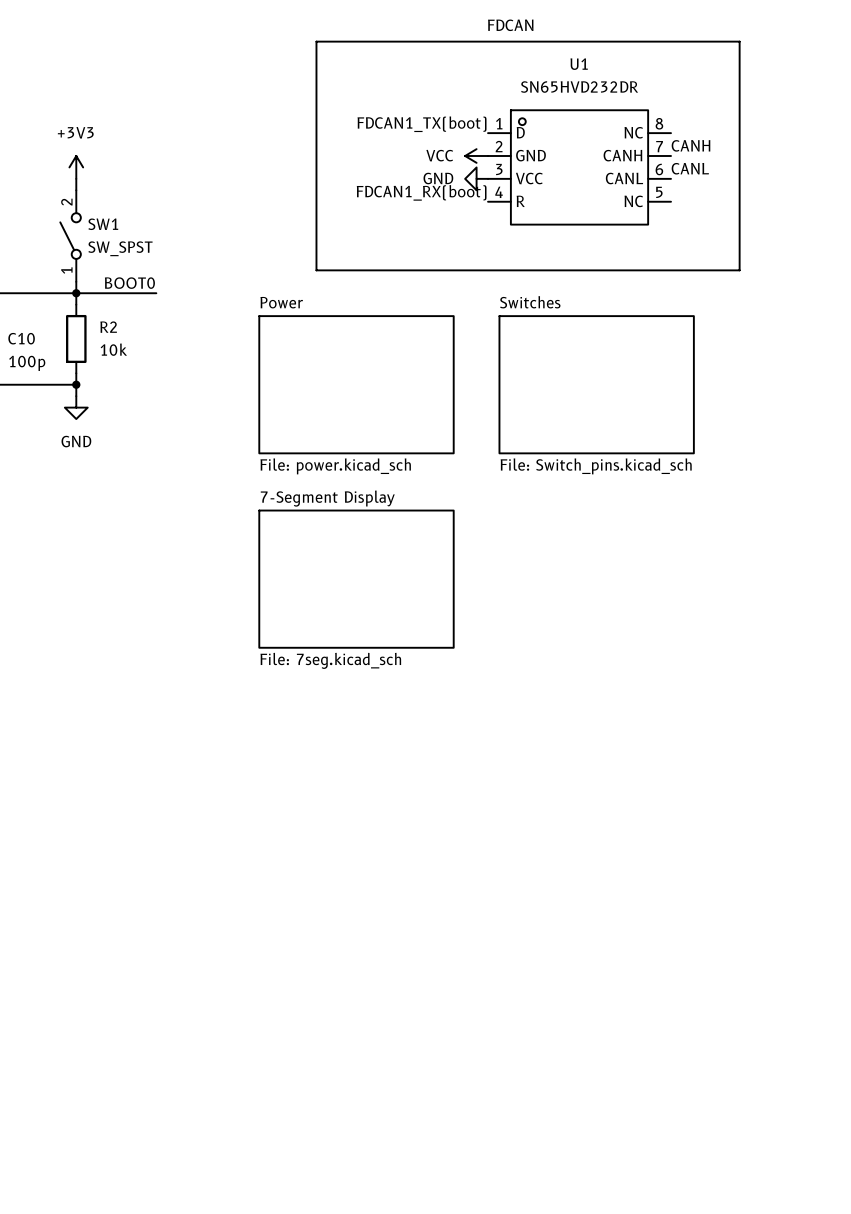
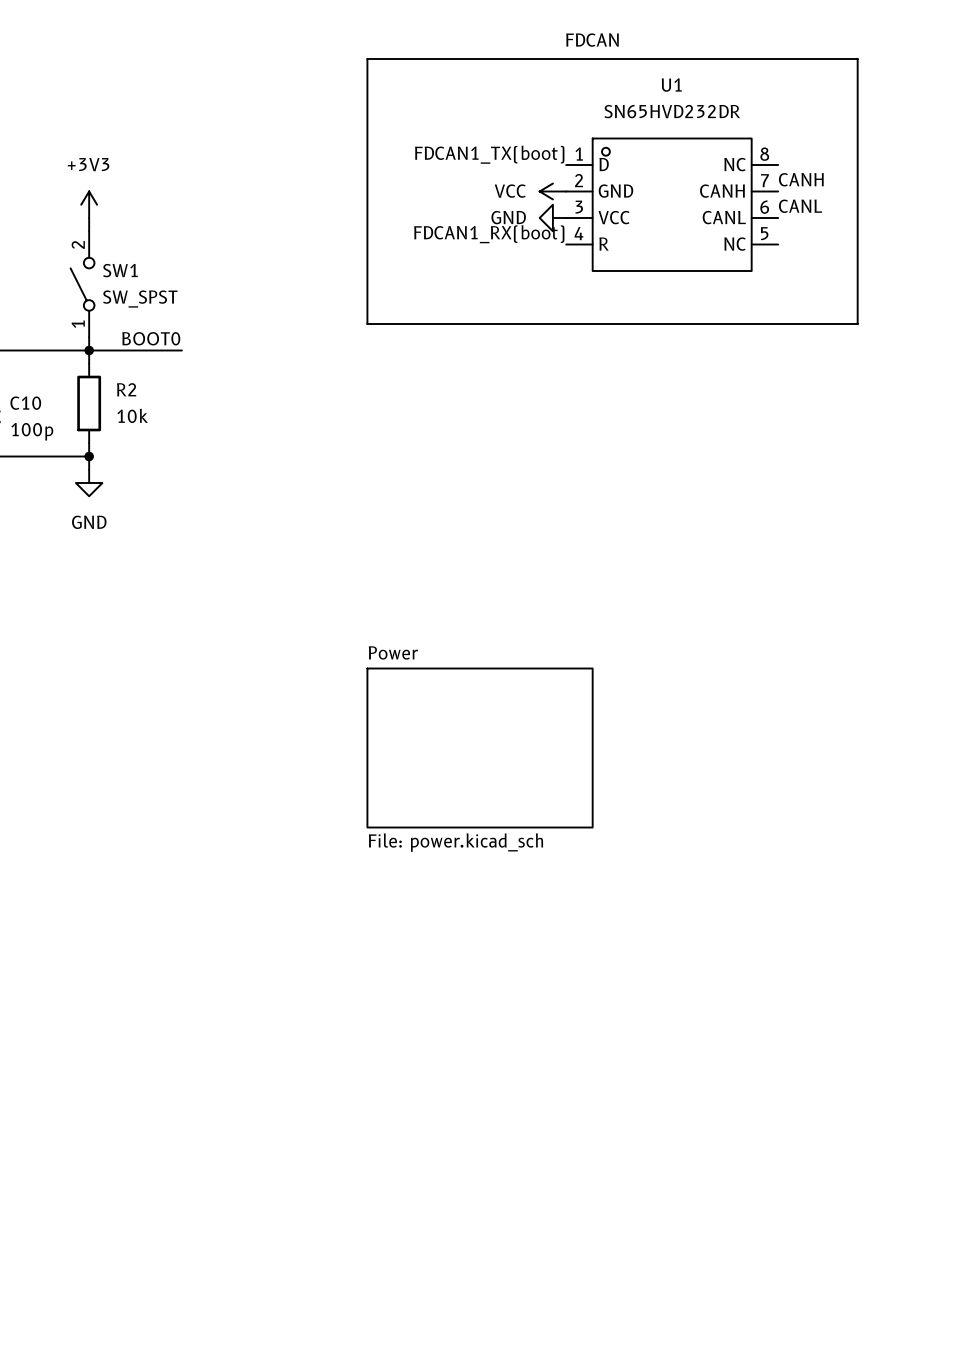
sheet Power: File: power.kicad_sch (356, 384) -> none
sheet Switches: File: Switch_pins.kicad_sch (596, 384) -> none
sheet 7-Segment Display: File: 7seg.kicad_sch (356, 579) -> none
sheet Power: none -> File: power.kicad_sch (480, 748)

